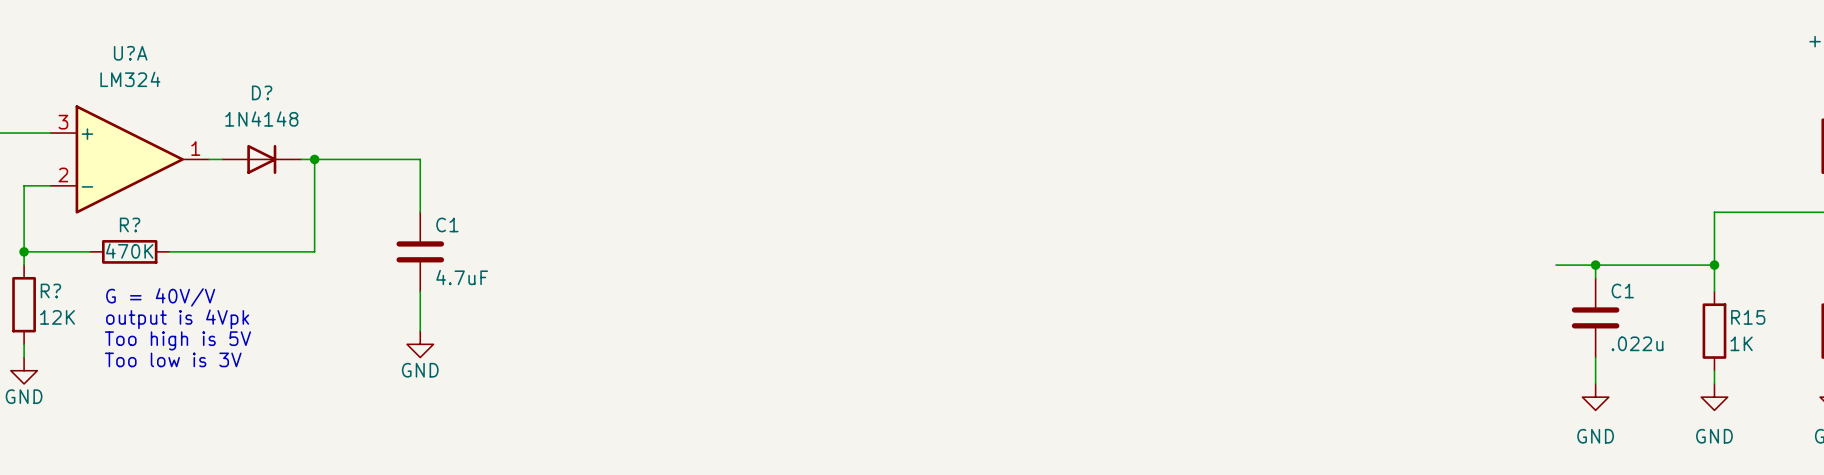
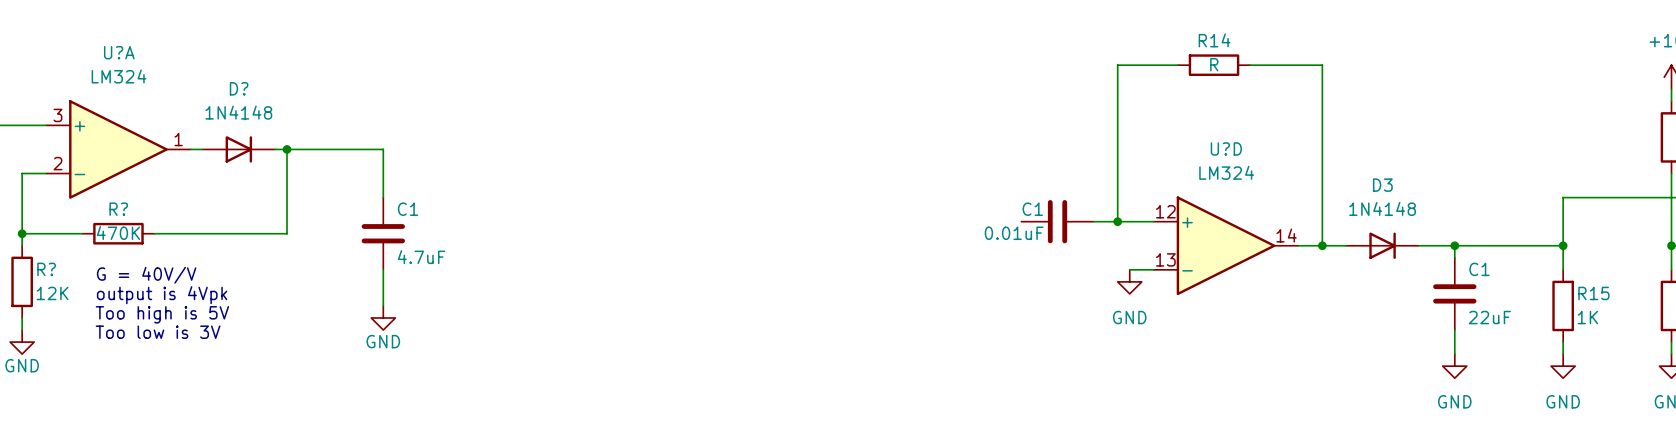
wire: none -> (1177, 65) (1117, 65) (1117, 221)
R14: none -> R (1214, 65)
wire: none -> (1250, 65) (1322, 65) (1322, 245)
C1: none -> 0.01uF (1057, 221)
wire: none -> (1093, 221) (1153, 221)
junction: none -> (1117, 221)
U?D: none -> LM324 (1226, 245)
wire: none -> (1298, 245) (1346, 245)
junction: none -> (1322, 245)
D3: none -> 1N4148 (1382, 245)
wire: none -> (1129, 269) (1153, 269)
power symbol: none -> GND (1129, 281)
C1 value: .022u (1637, 343) -> 22uF (1489, 317)

